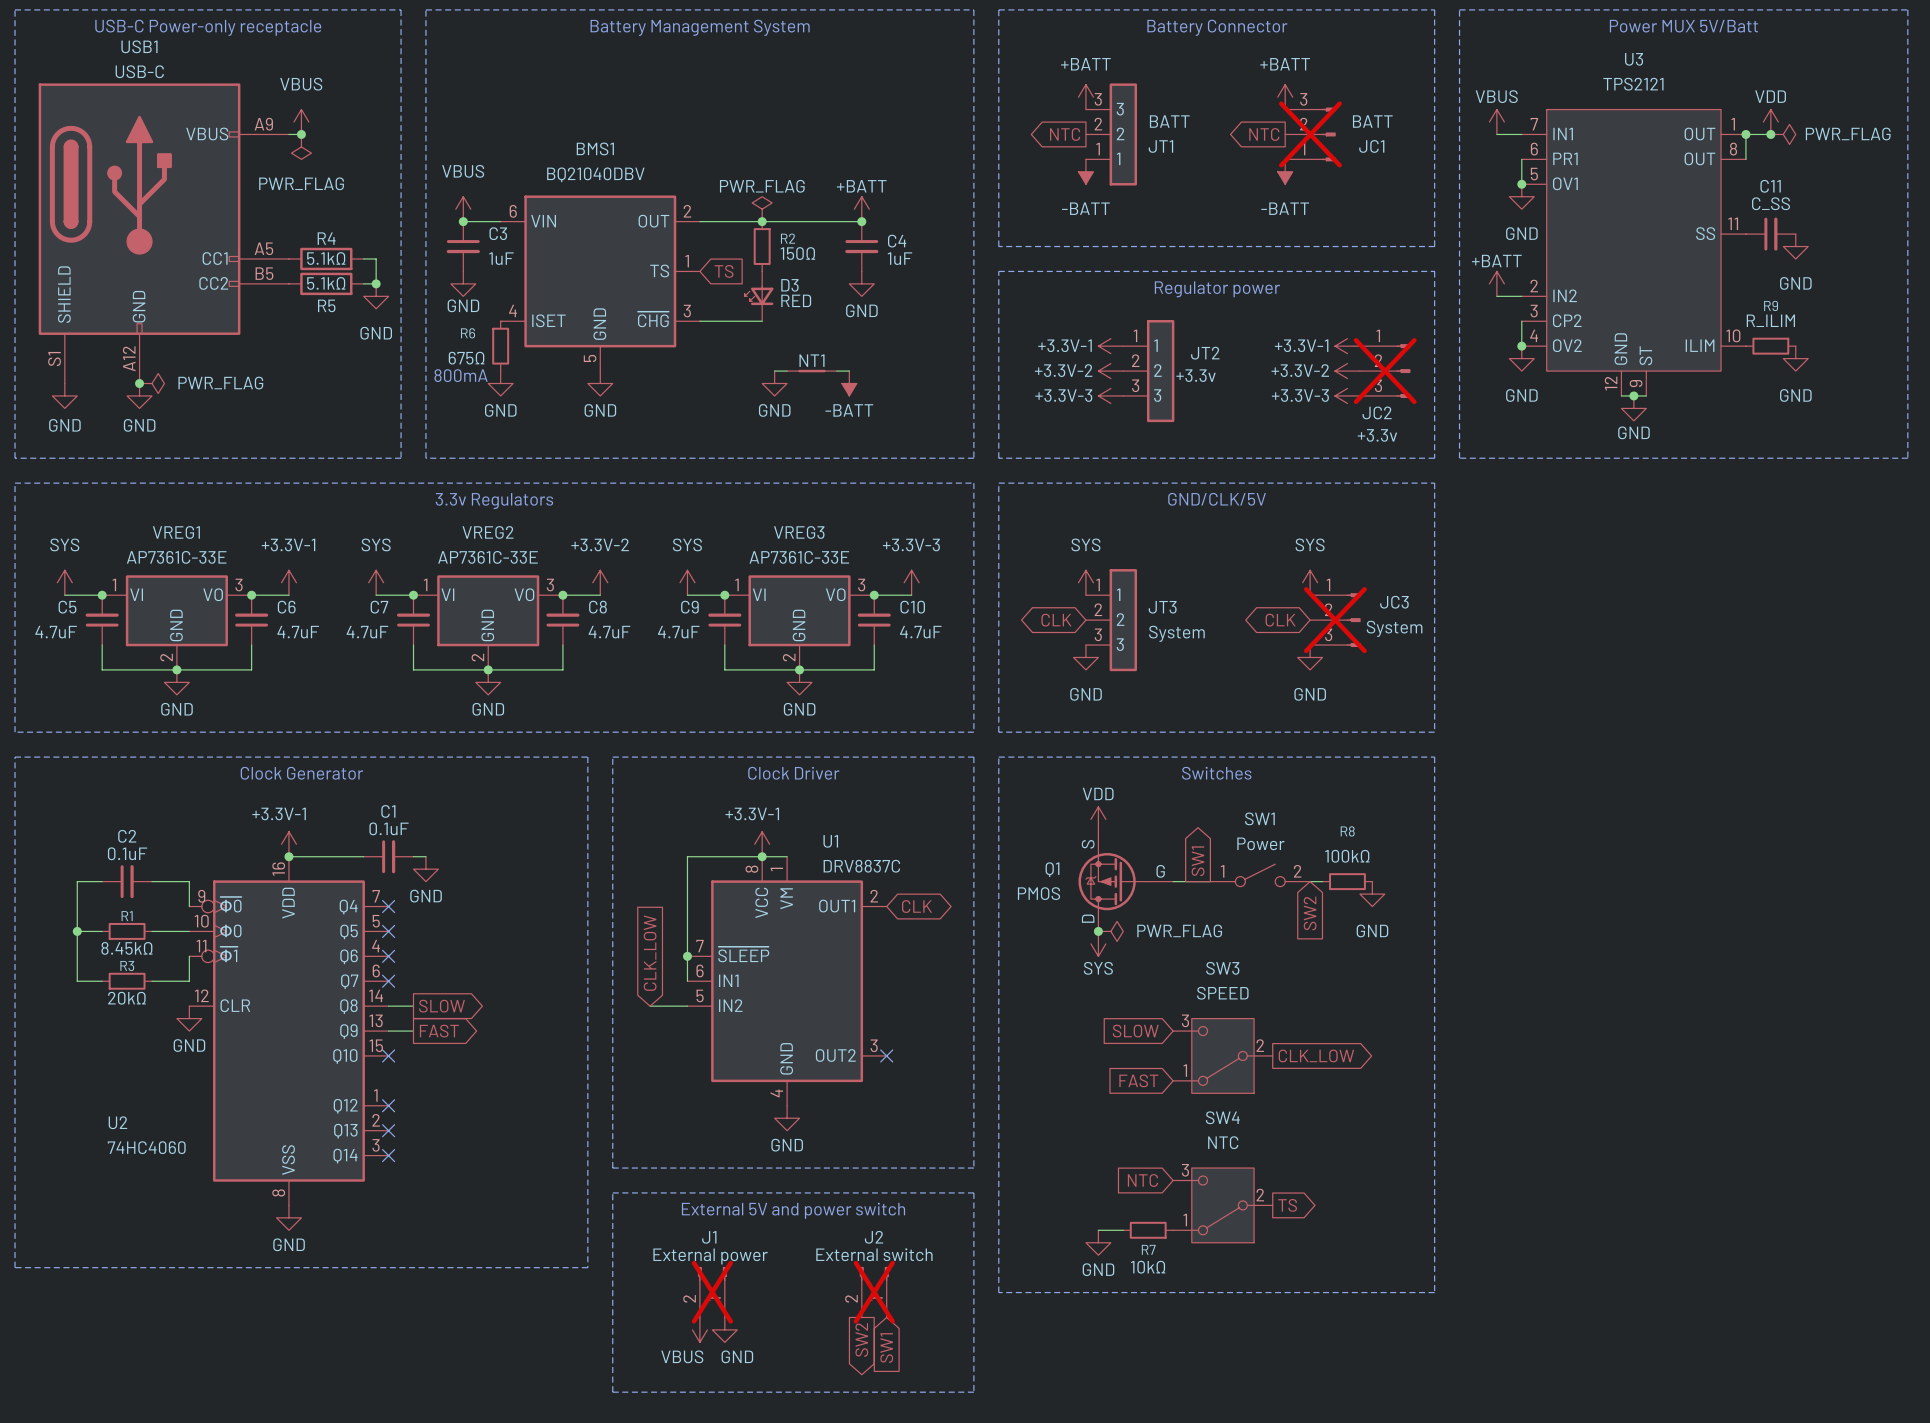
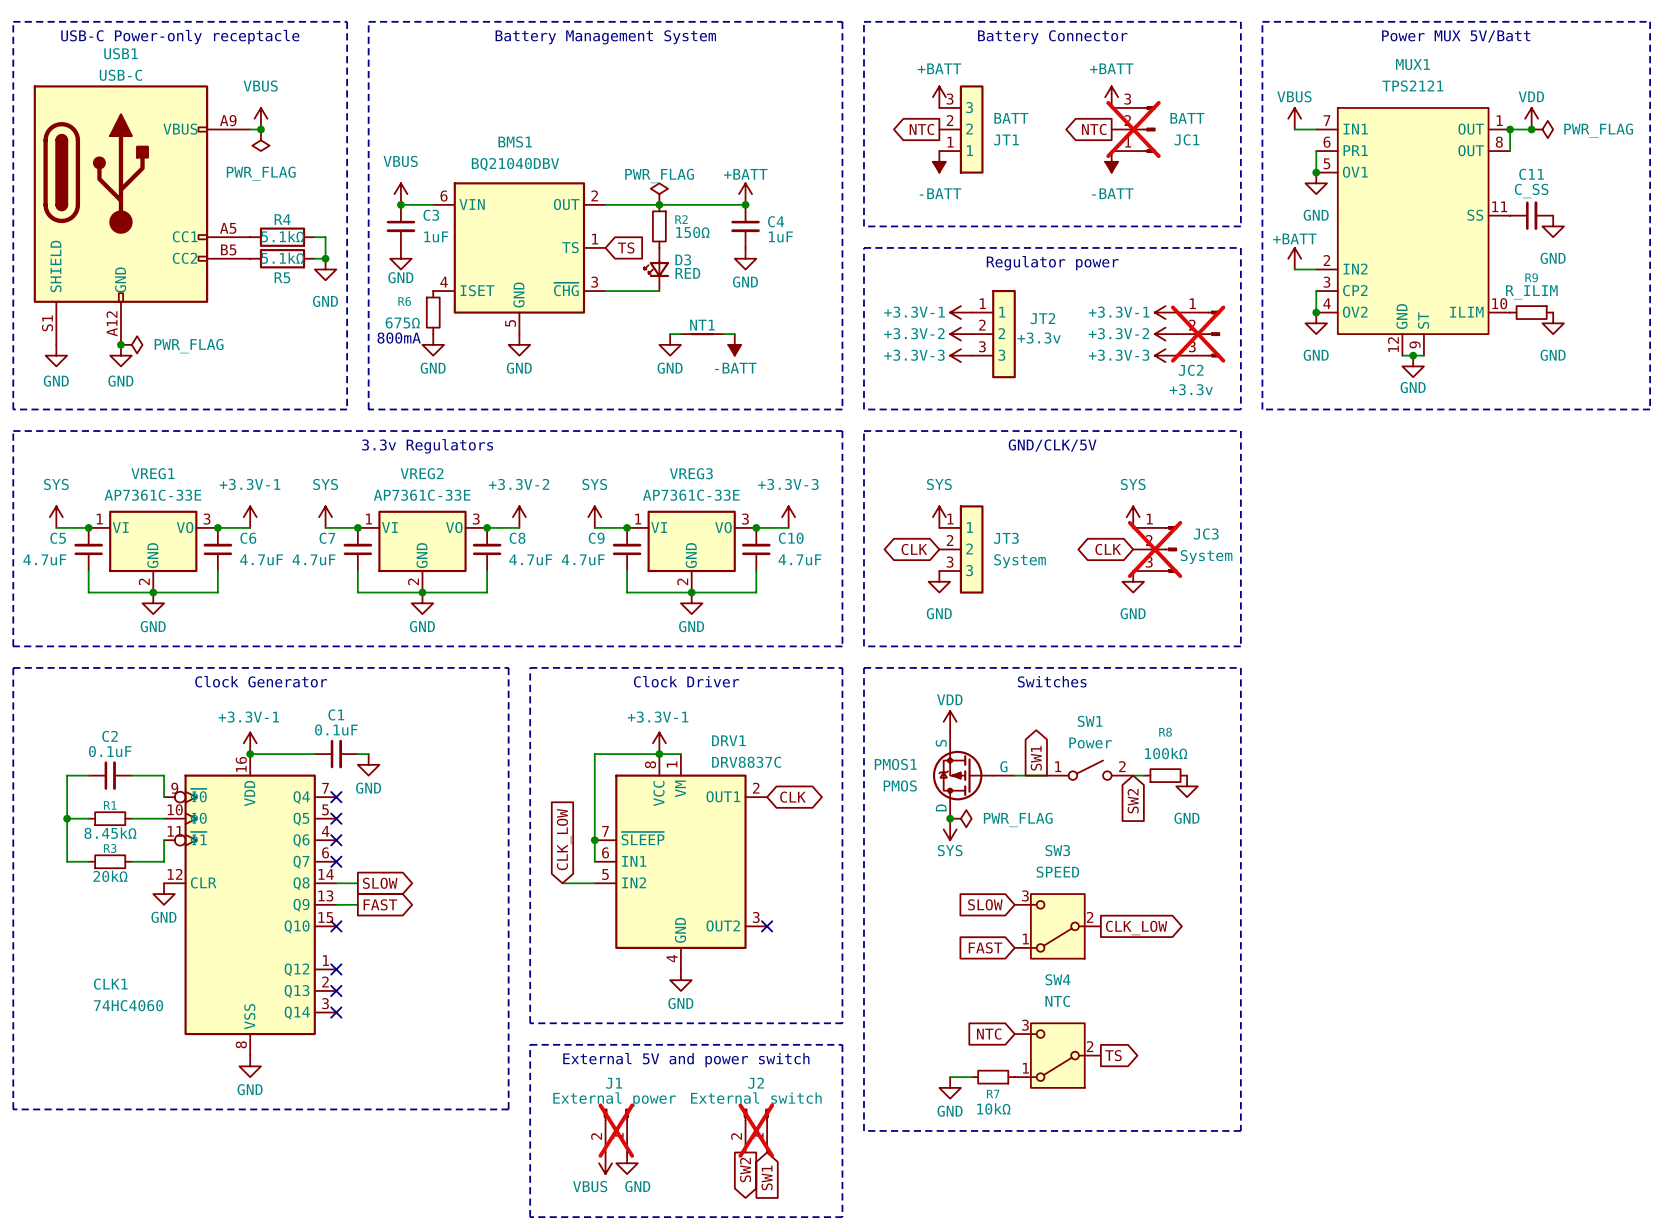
U3 name: U3 (1634, 59) -> MUX1 (1412, 64)
U1 name: U1 (830, 841) -> DRV1 (728, 740)
Q1 name: Q1 (1052, 869) -> PMOS1 (895, 764)
U2 name: U2 (117, 1122) -> CLK1 (110, 984)

